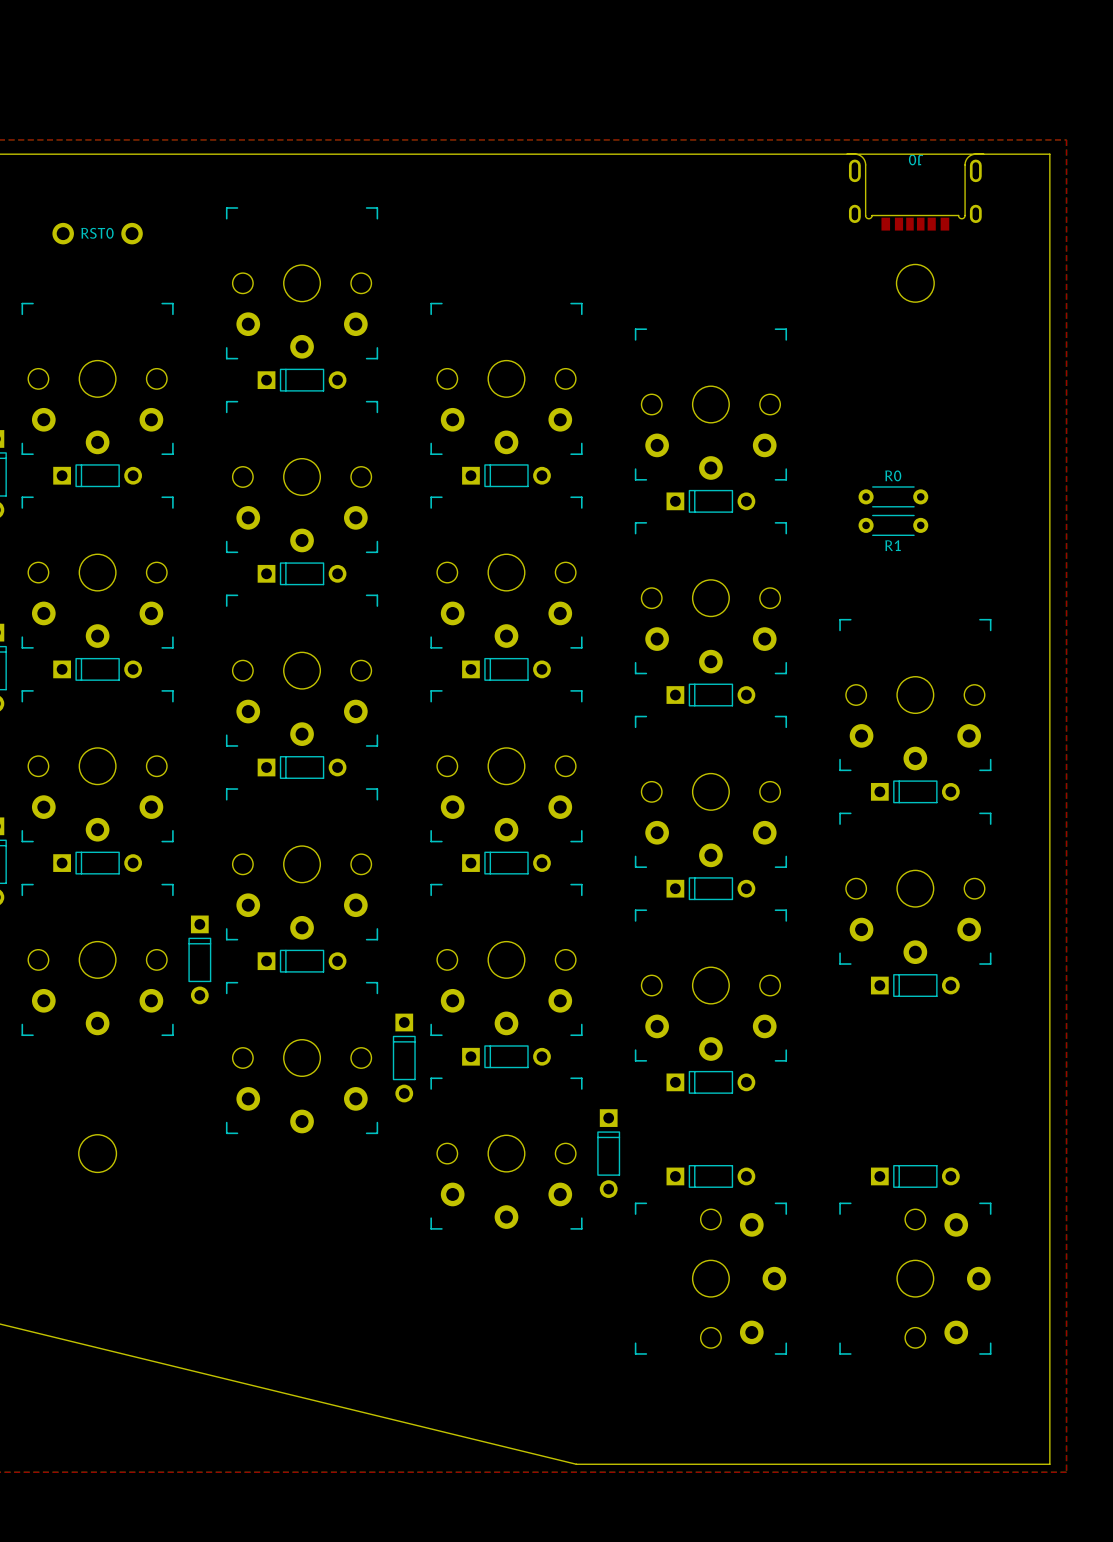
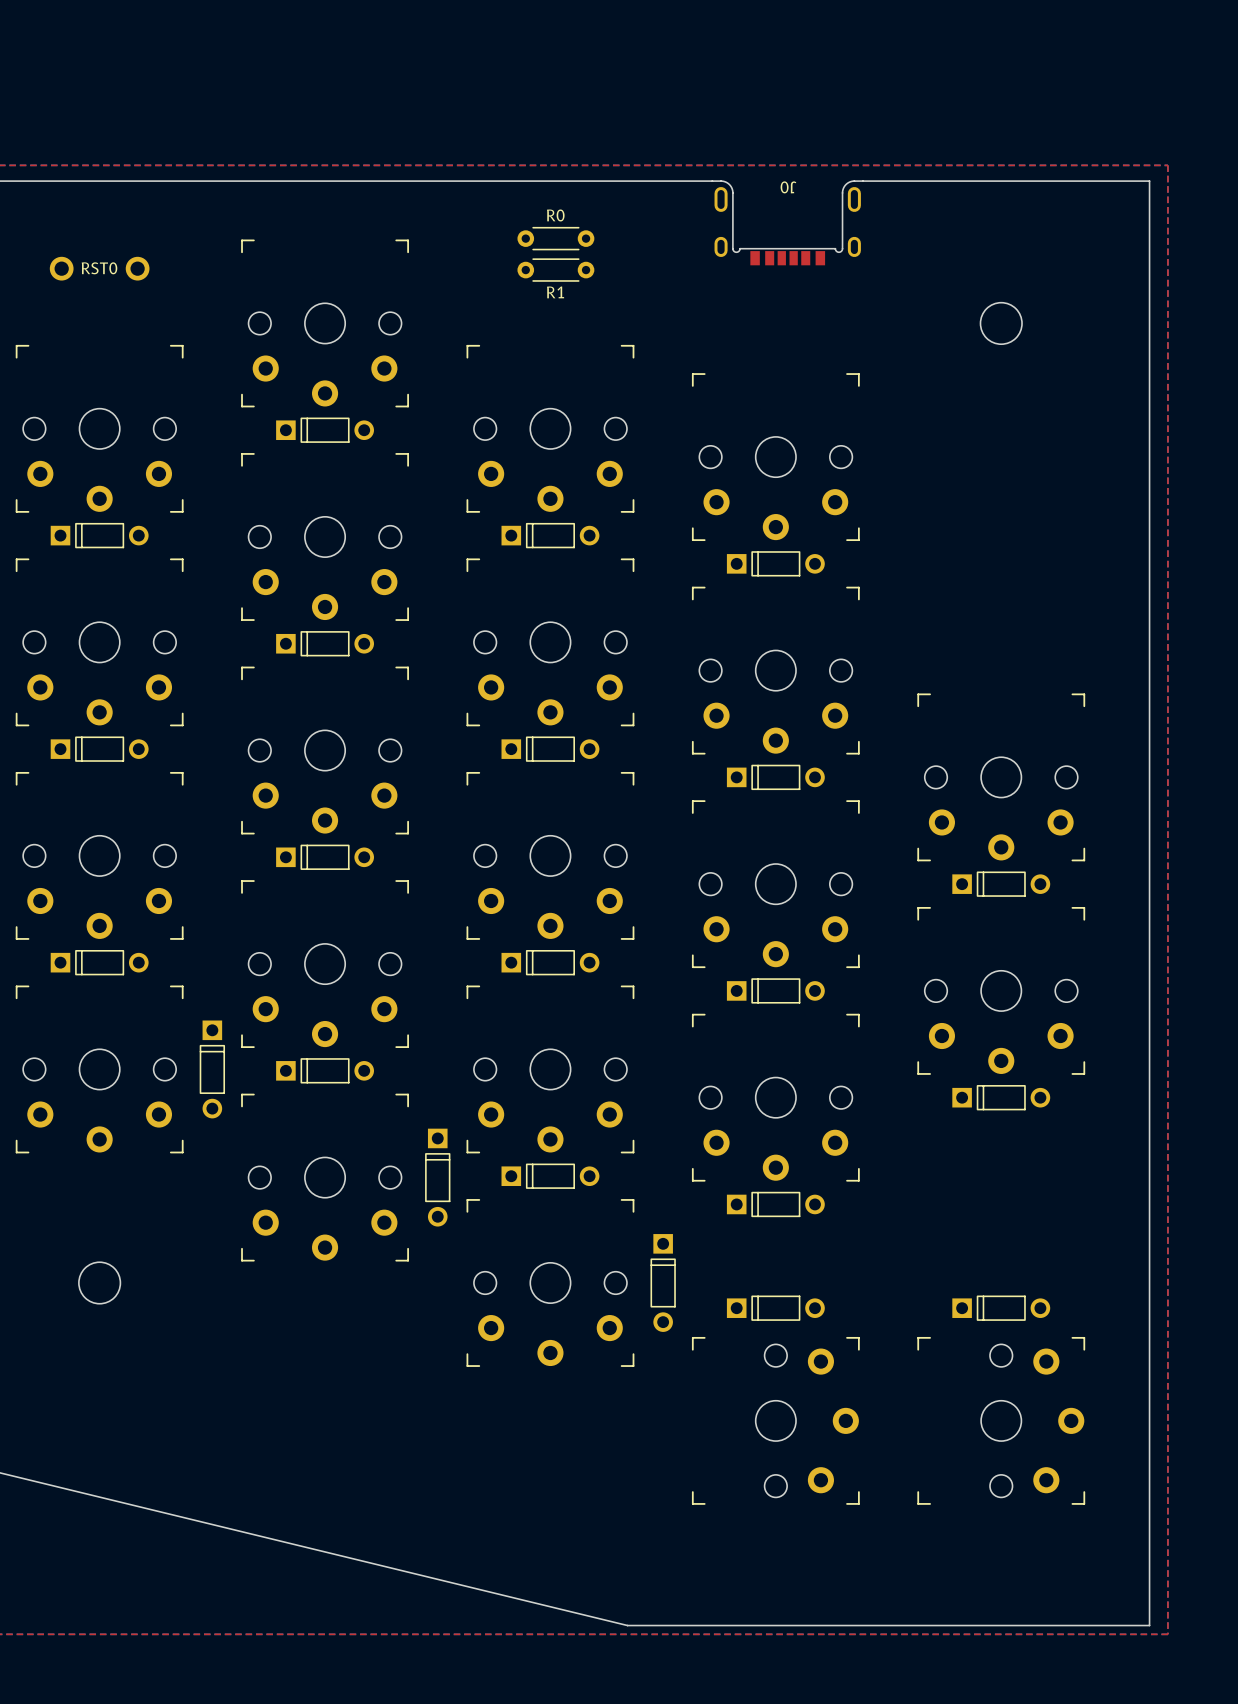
board edge: (653, 154) (790, 154) -> none
J0 position: (915, 192) -> (787, 223)
R0 position: (893, 496) -> (555, 238)
R1 position: (893, 525) -> (555, 270)

